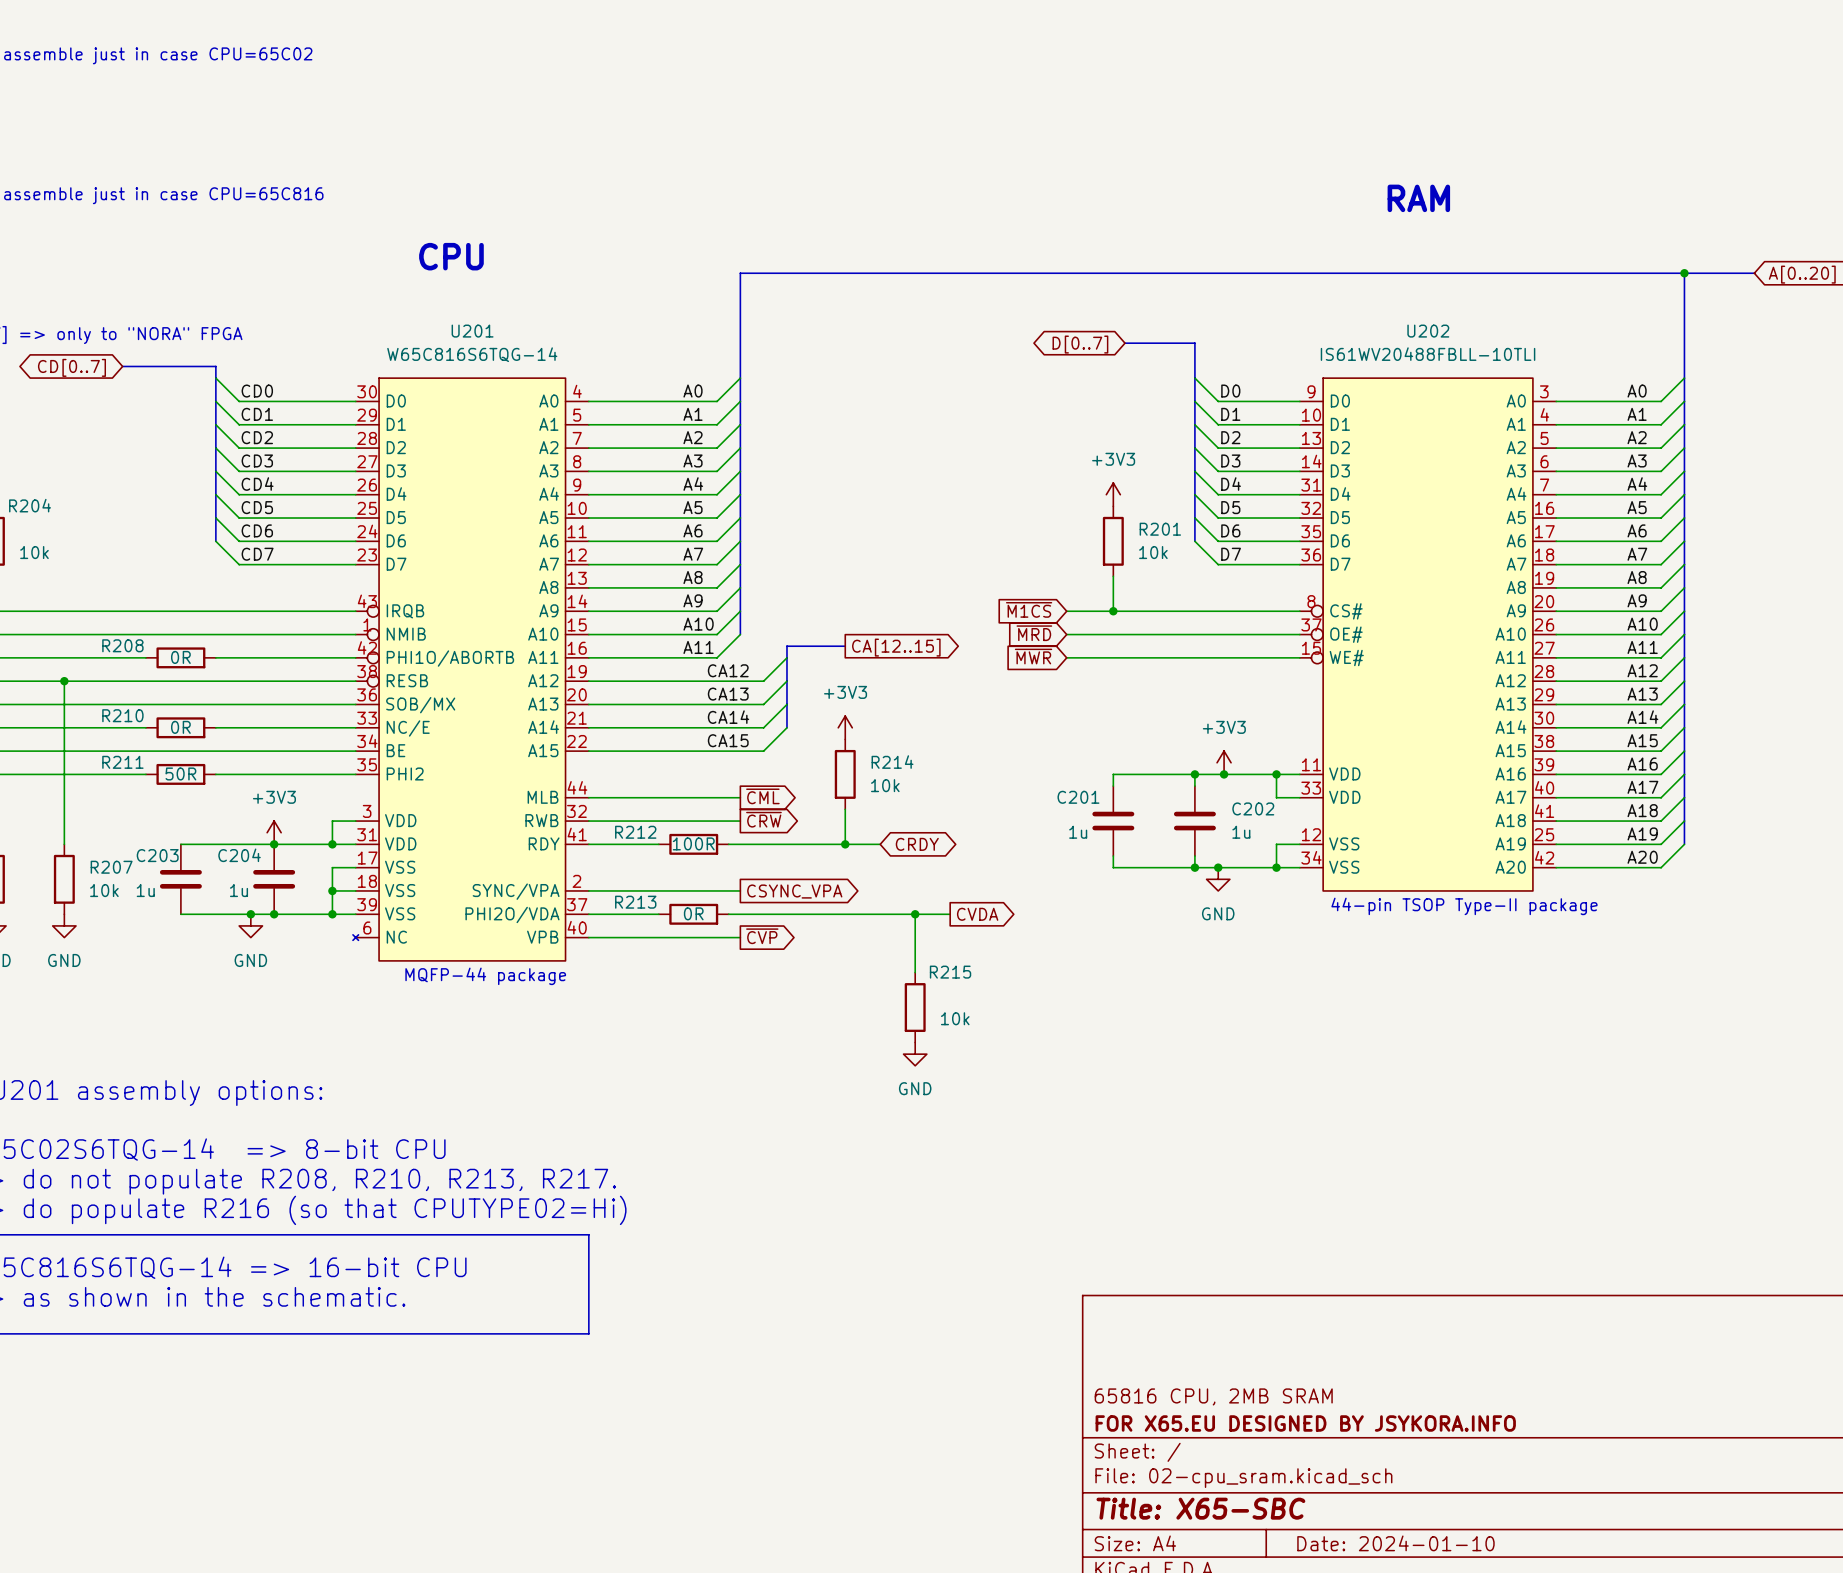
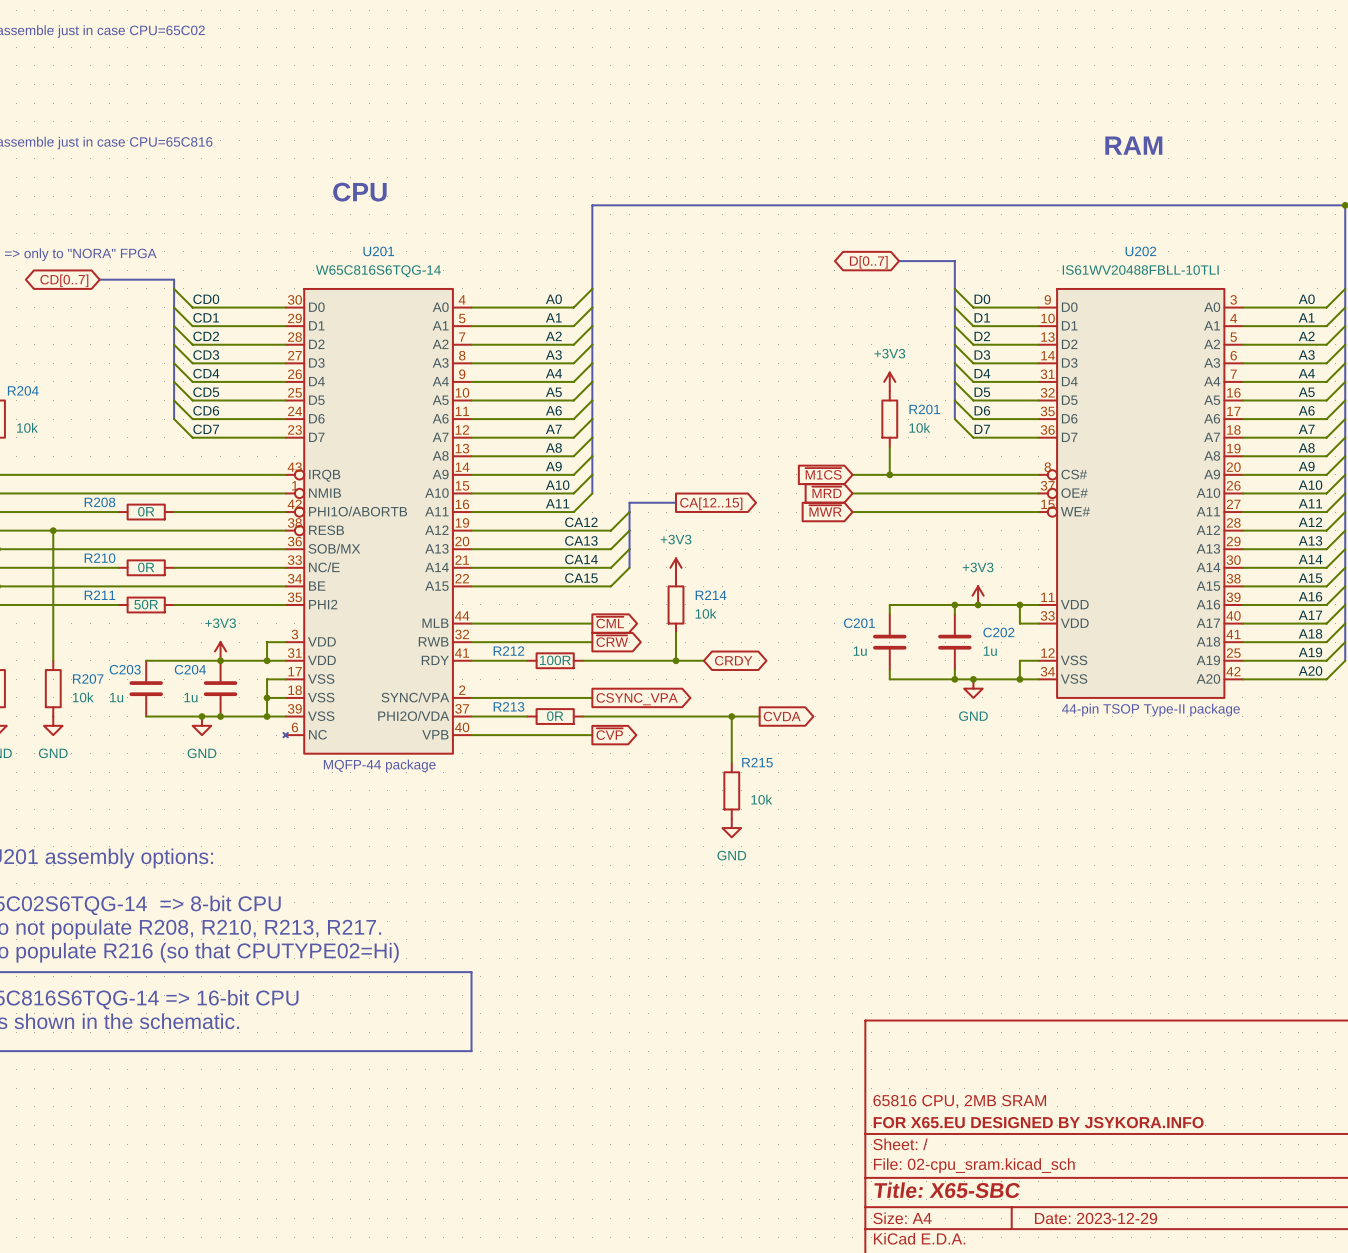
title block: Date: 2024-01-10 (1395, 1543) -> Date: 2023-12-29 (1096, 1218)

